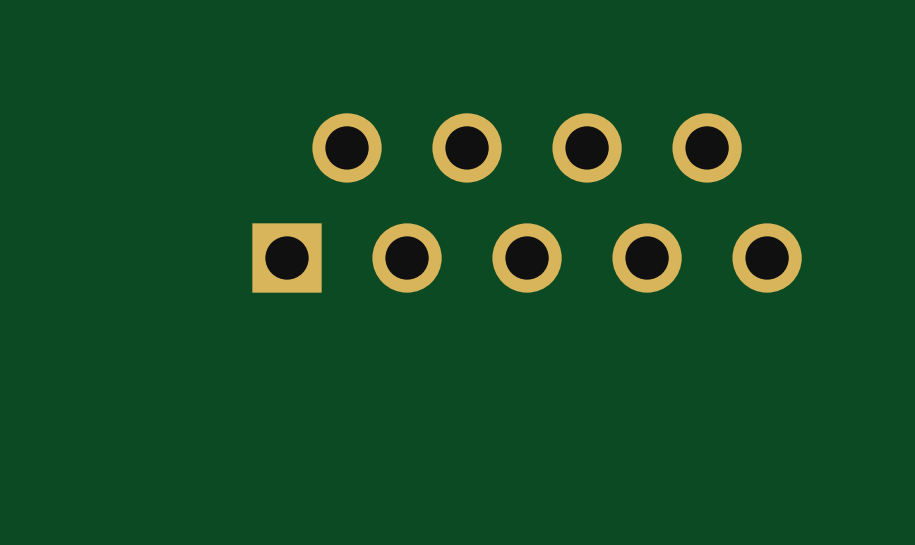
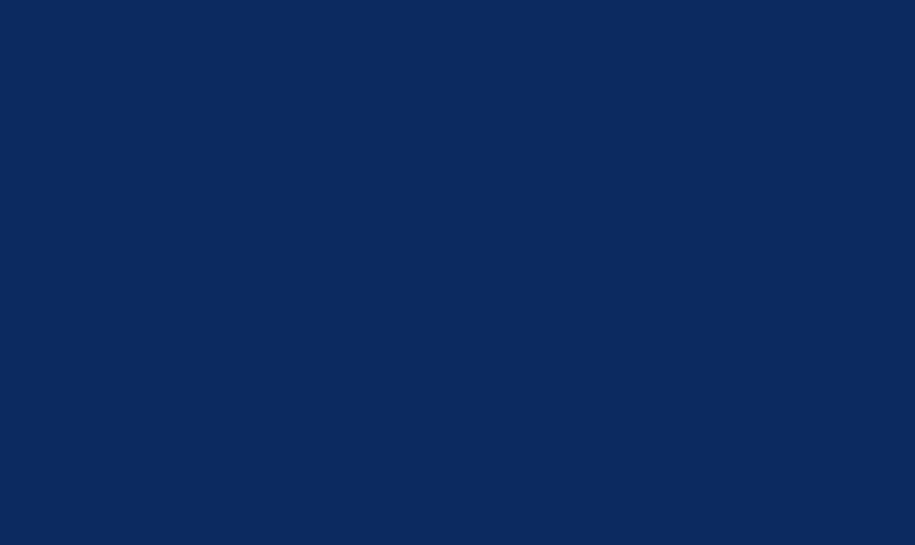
part: (527, 202) -> none

